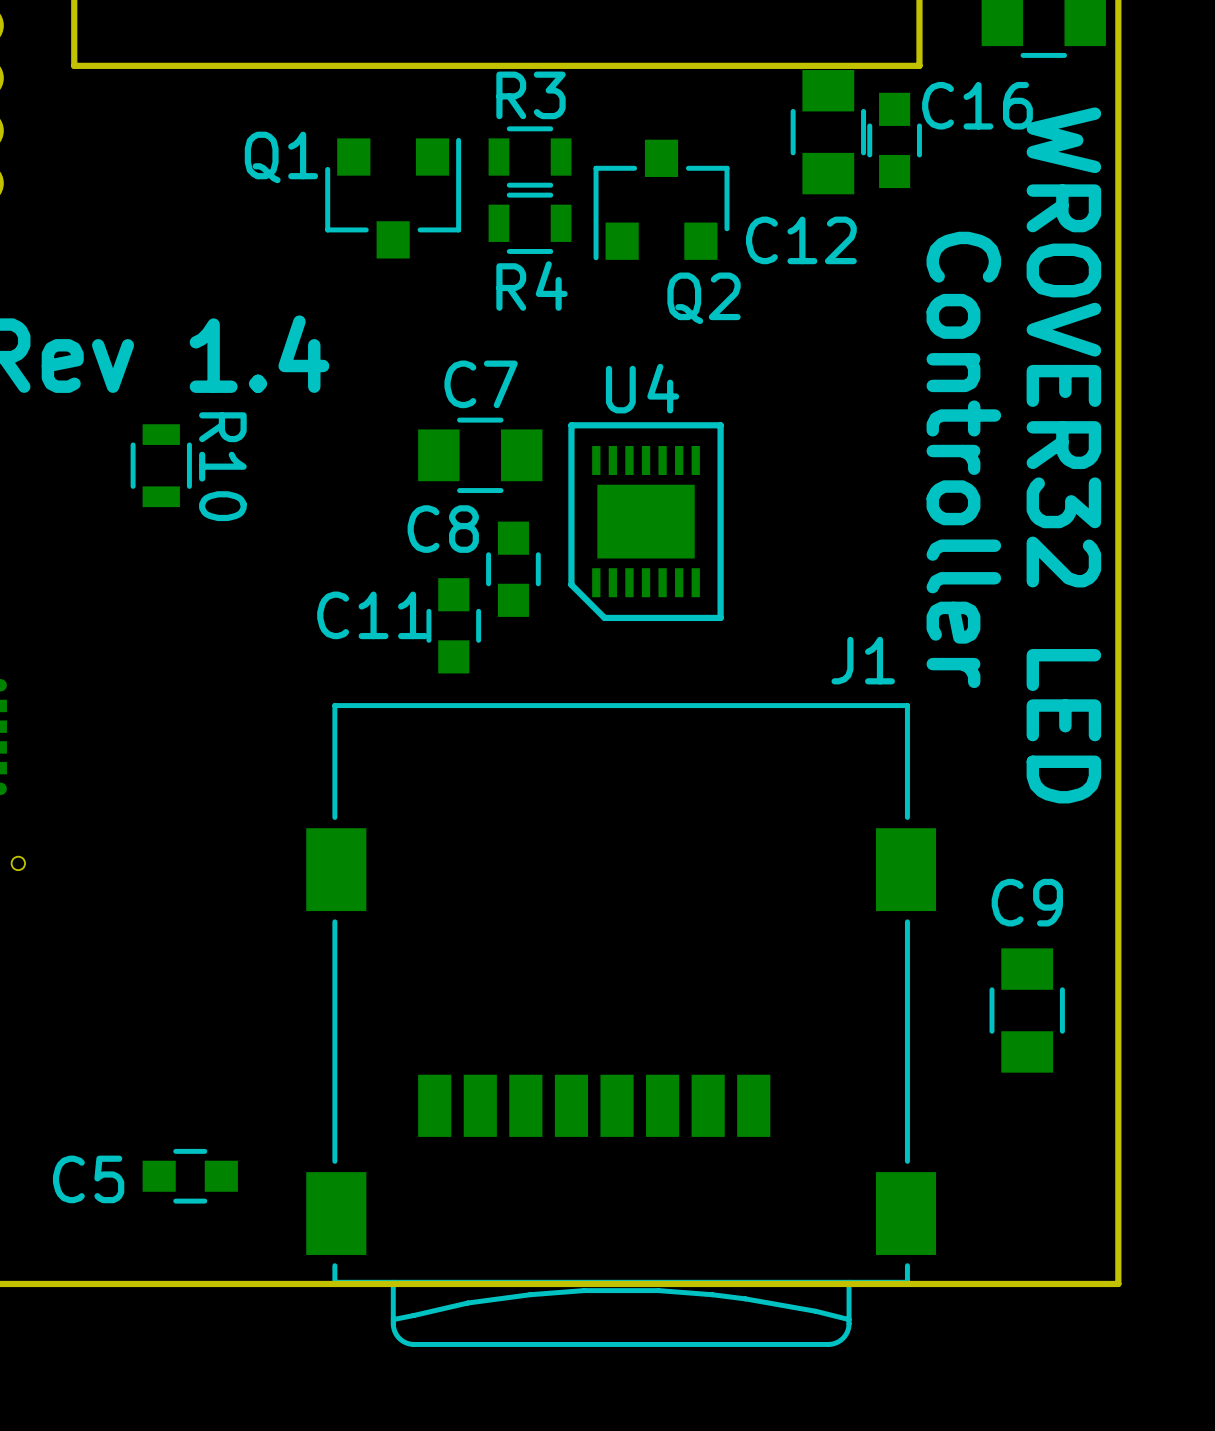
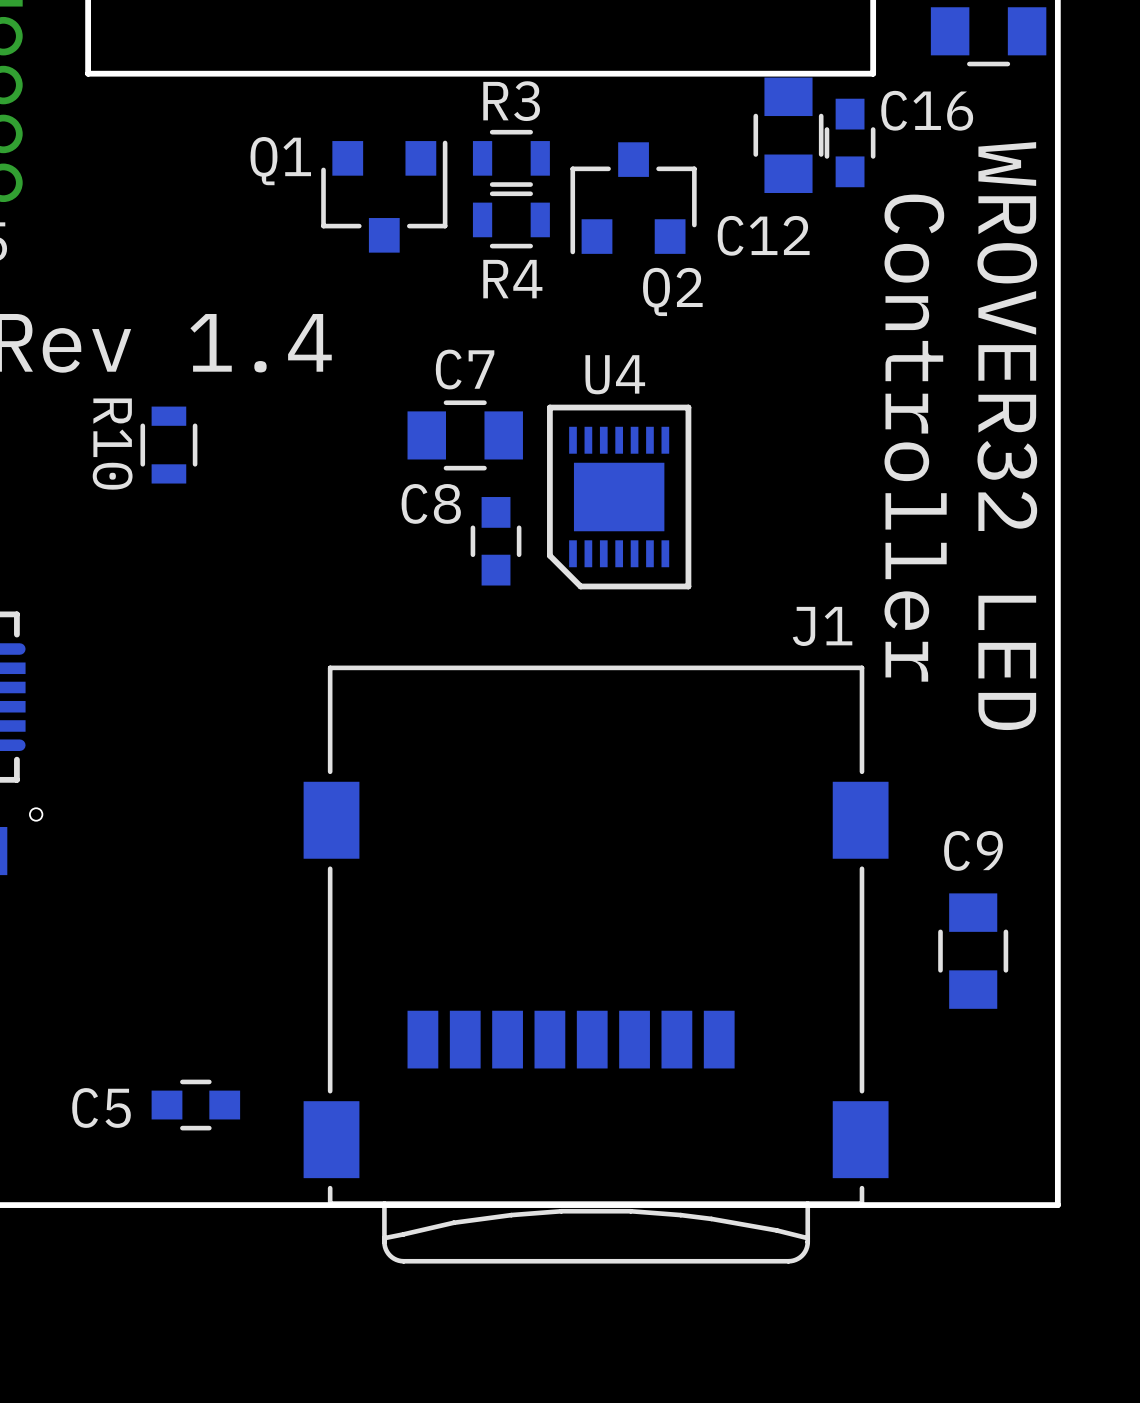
R10 name position: R10 (222, 466) -> R10 (112, 444)
C11: (453, 625) -> none

